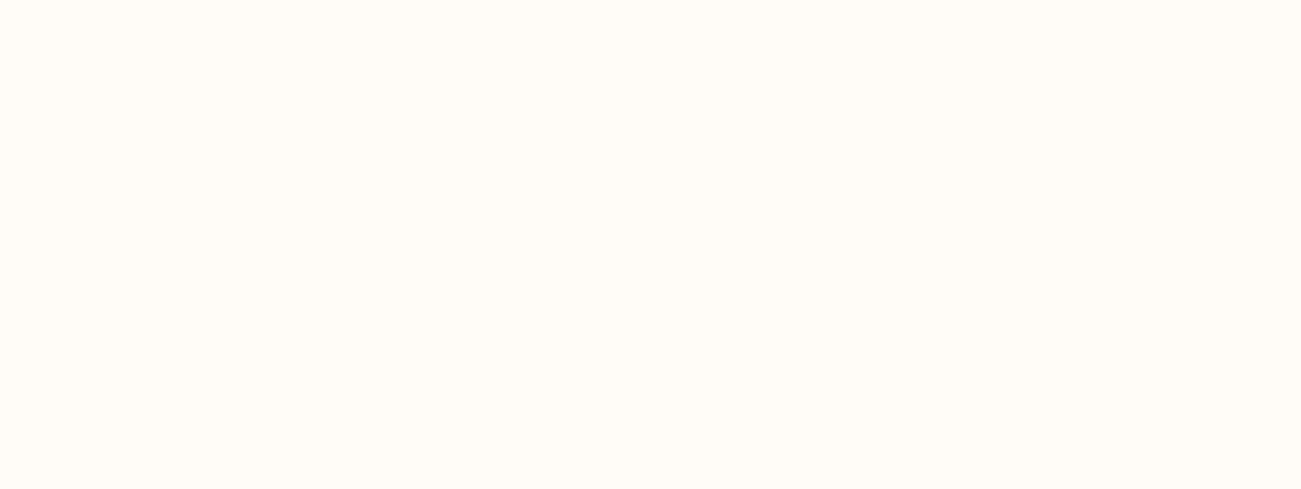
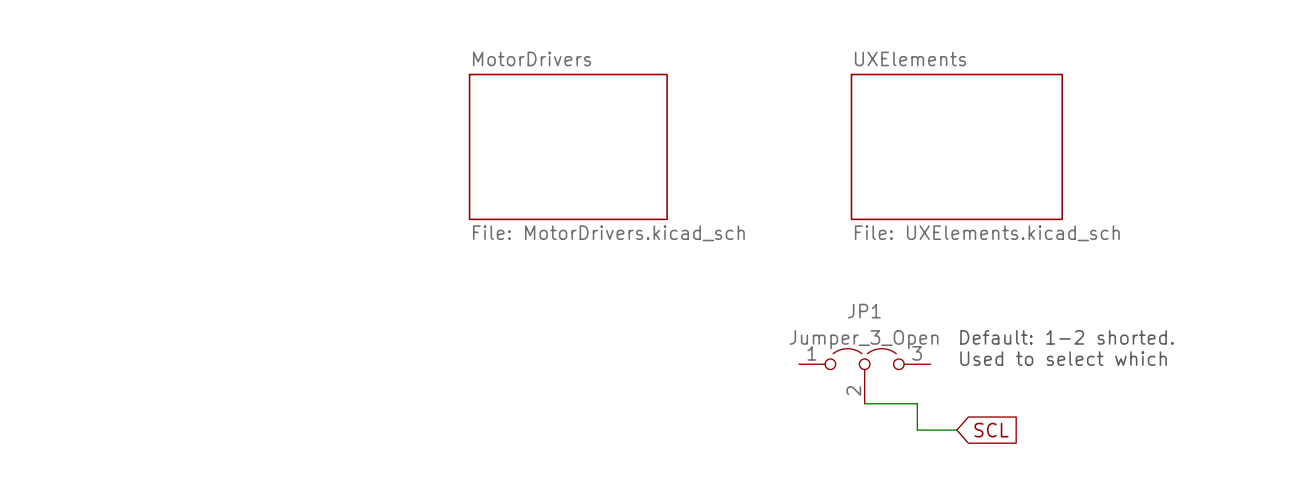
sheet MotorDrivers: none -> File: MotorDrivers.kicad_sch (568, 146)
sheet UXElements: none -> File: UXElements.kicad_sch (956, 146)
text: none -> Default: 1-2 shorted. (1067, 337)
text: none -> Used to select which (1063, 358)
JP1: none -> Jumper_3_Open (864, 376)
wire: none -> (864, 403) (917, 403) (917, 430) (956, 430)
global label: none -> SCL (991, 430)

